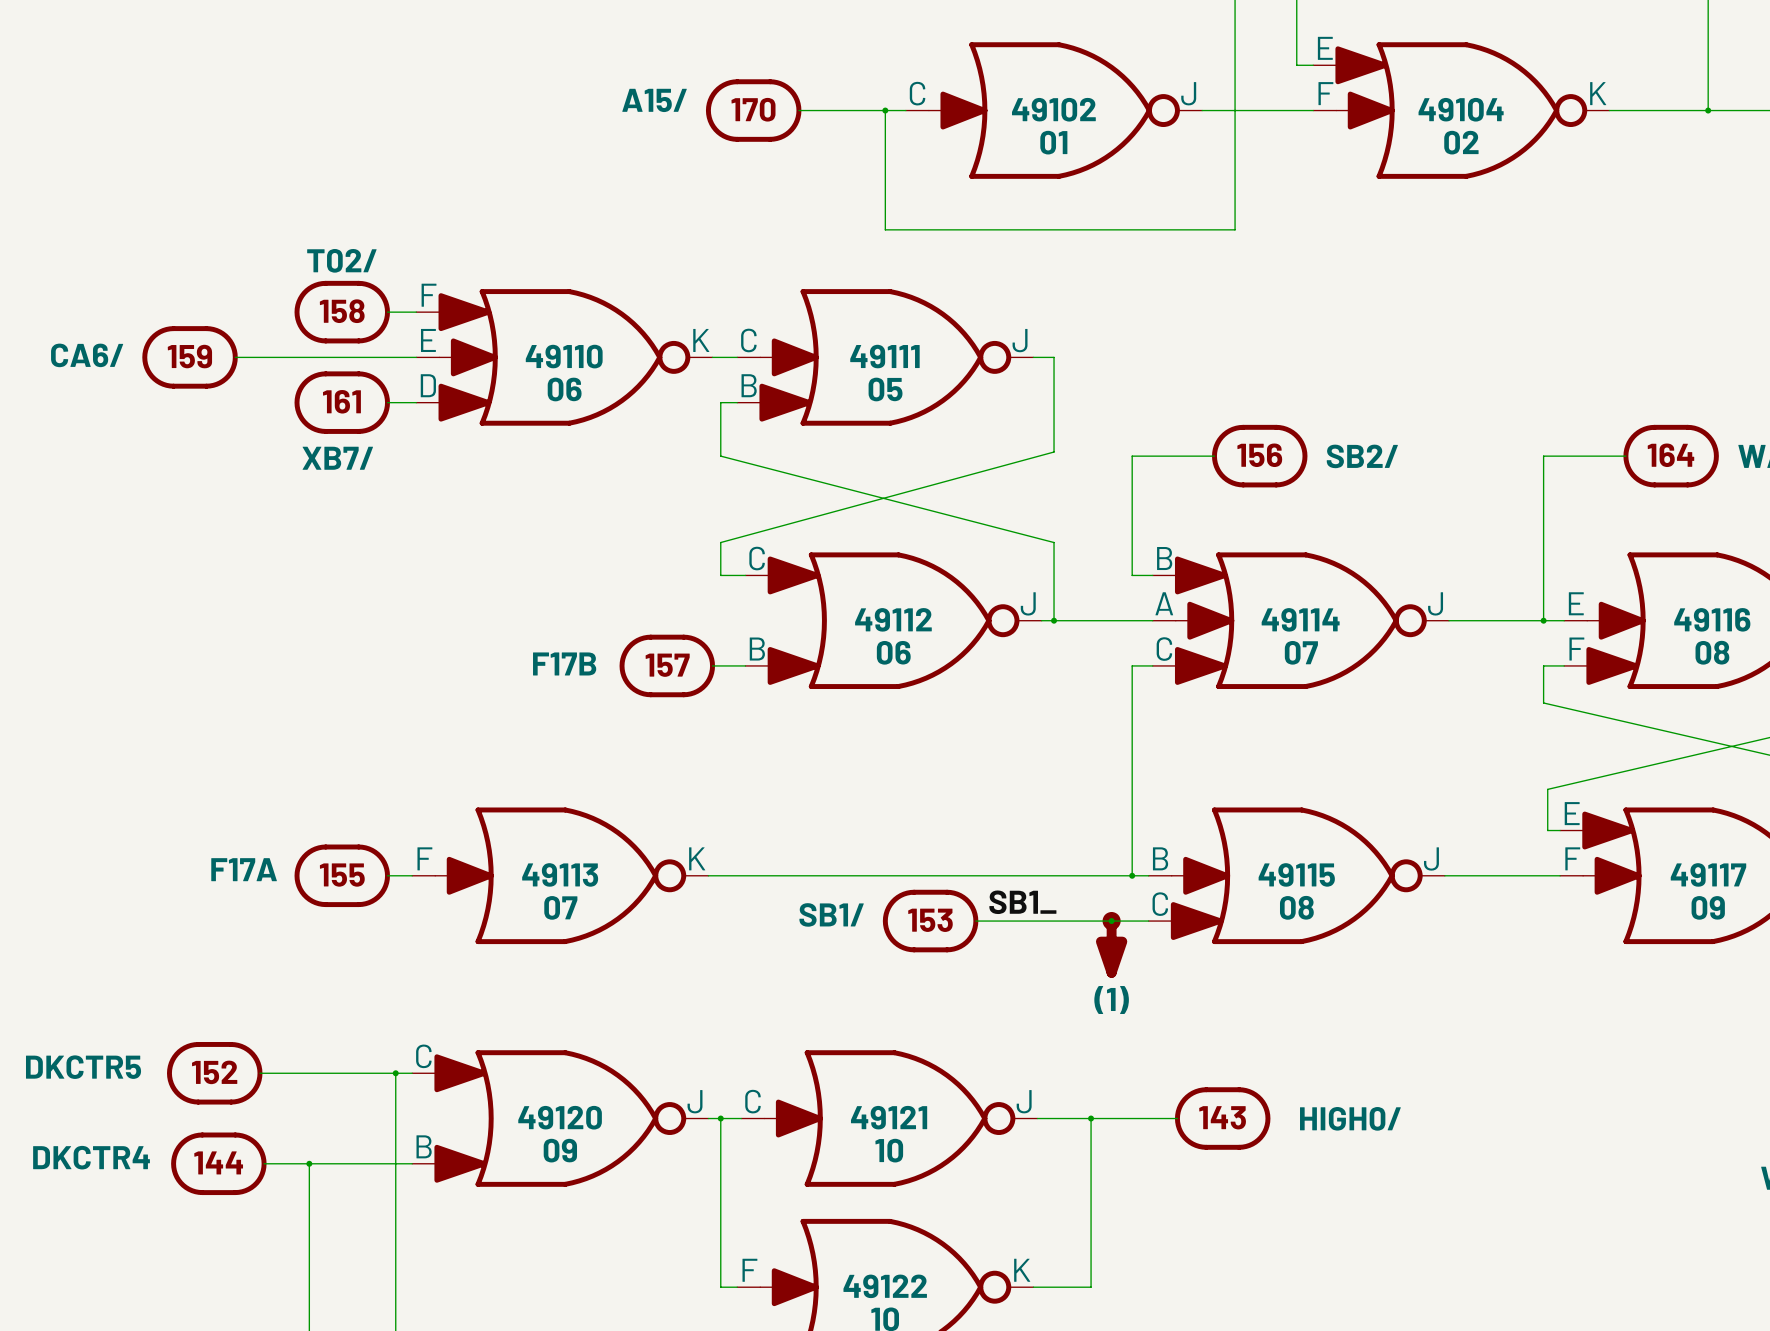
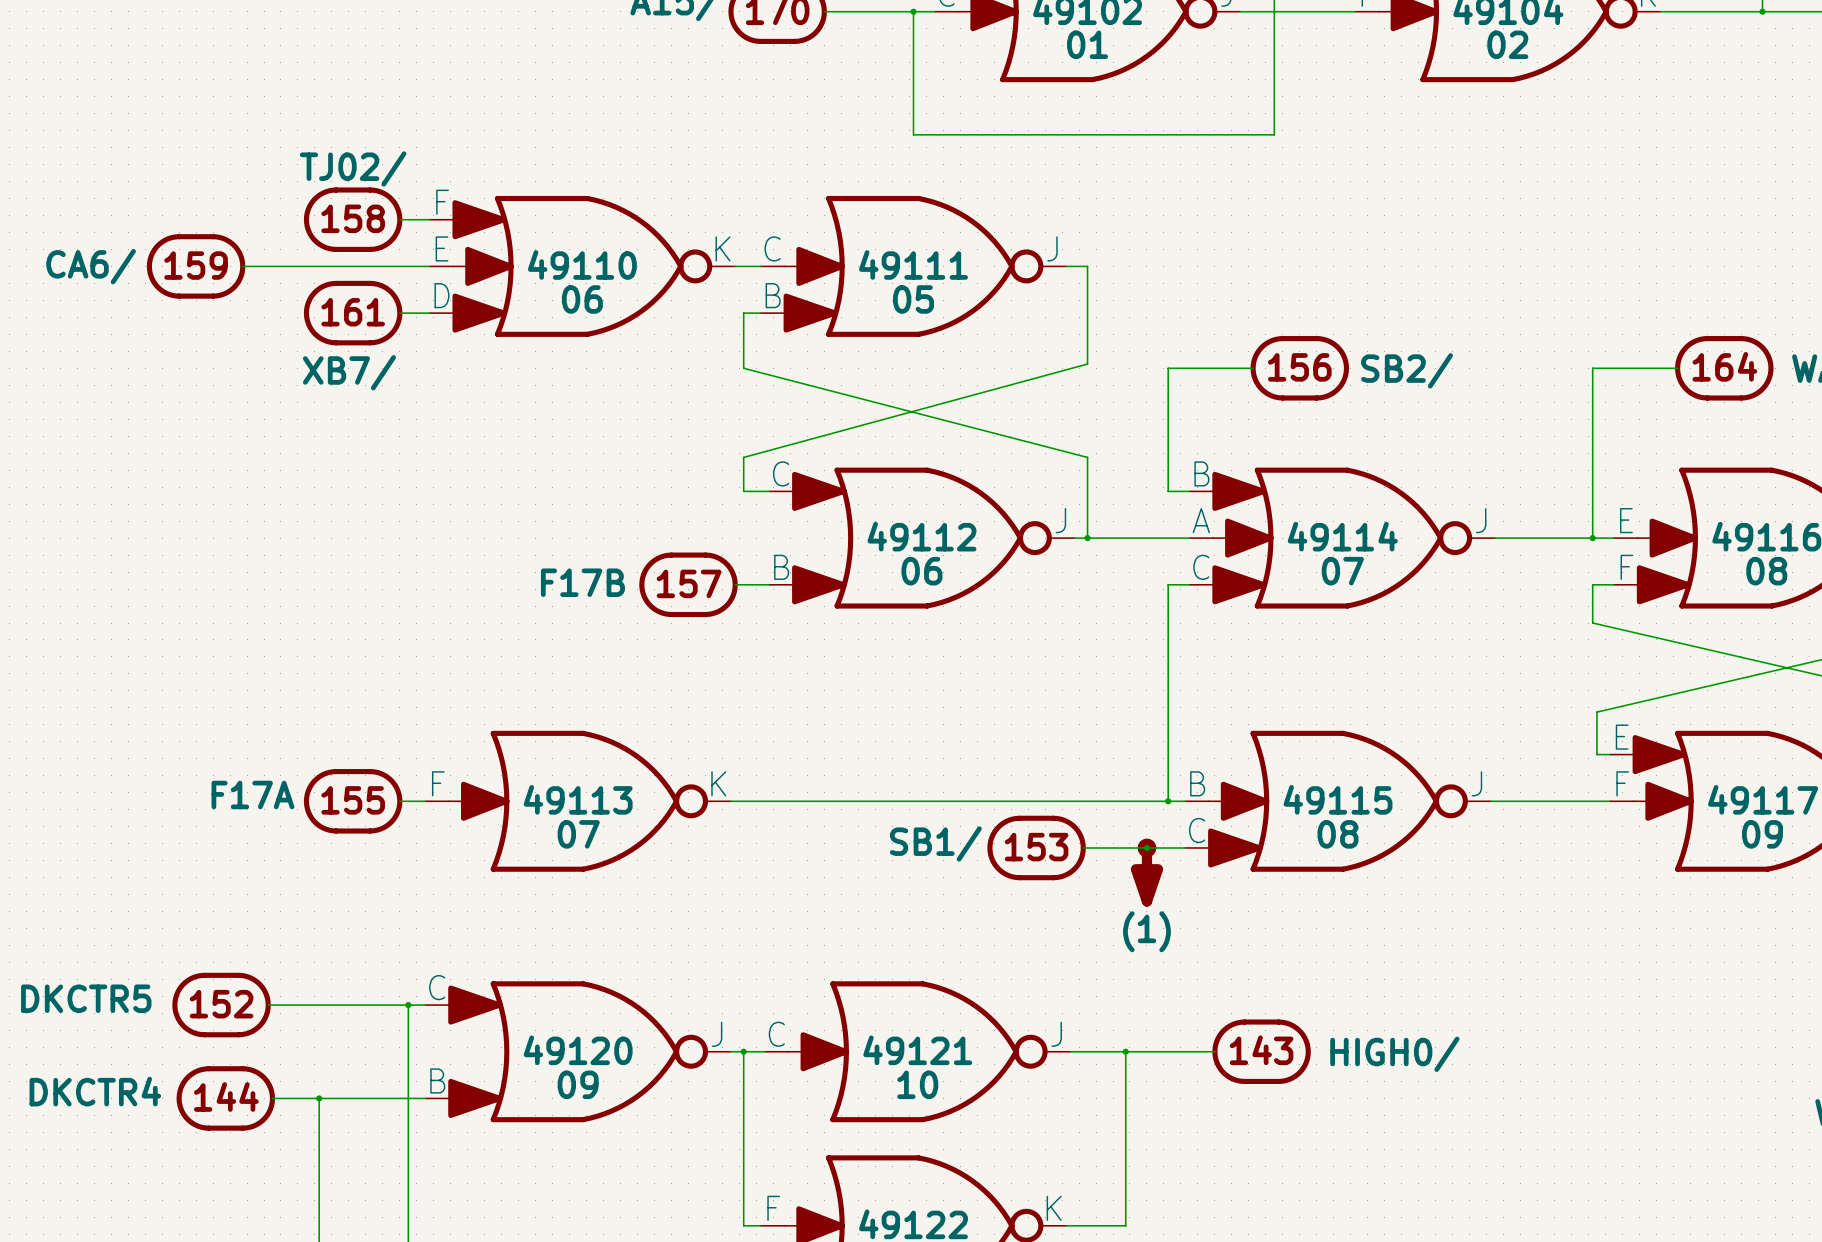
part text: T02/ (341, 260) -> TJ02/ (353, 168)
label: SB1_ (1022, 902) -> none
part position: (930, 921) -> (1036, 847)
wire: (975, 921) (1049, 921) -> none

